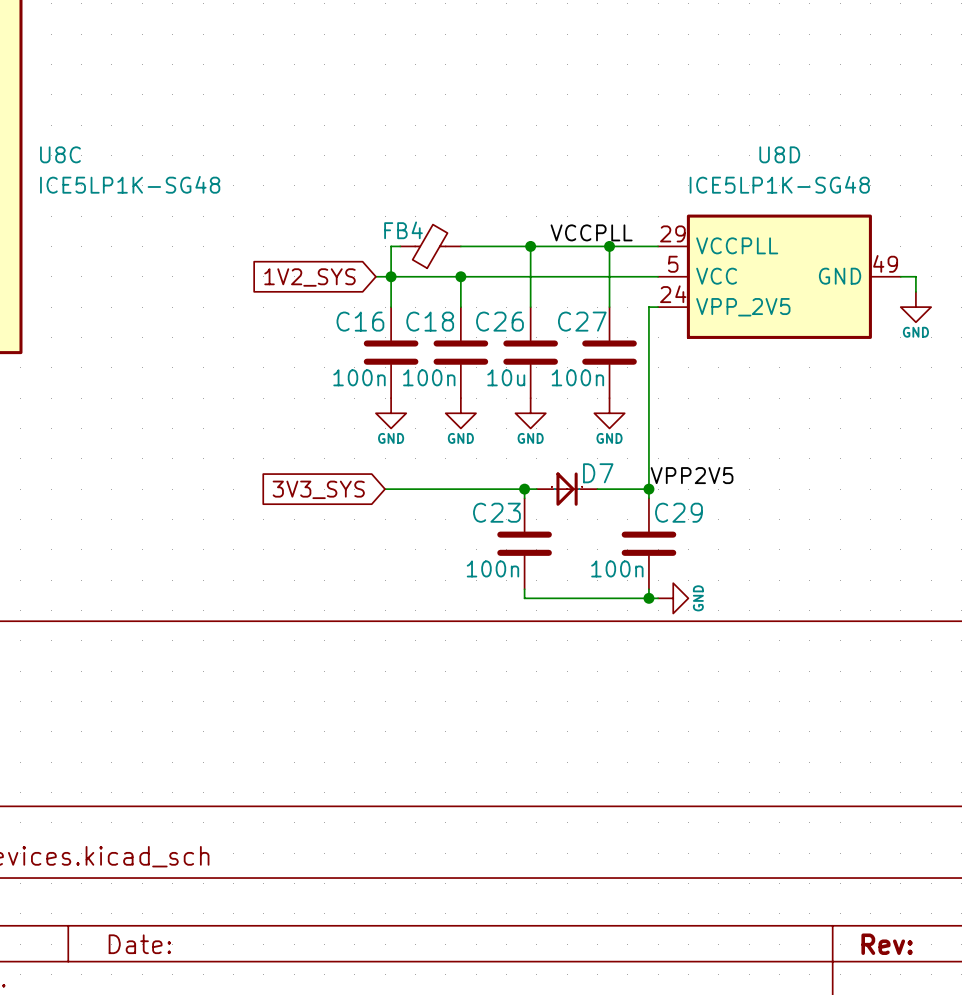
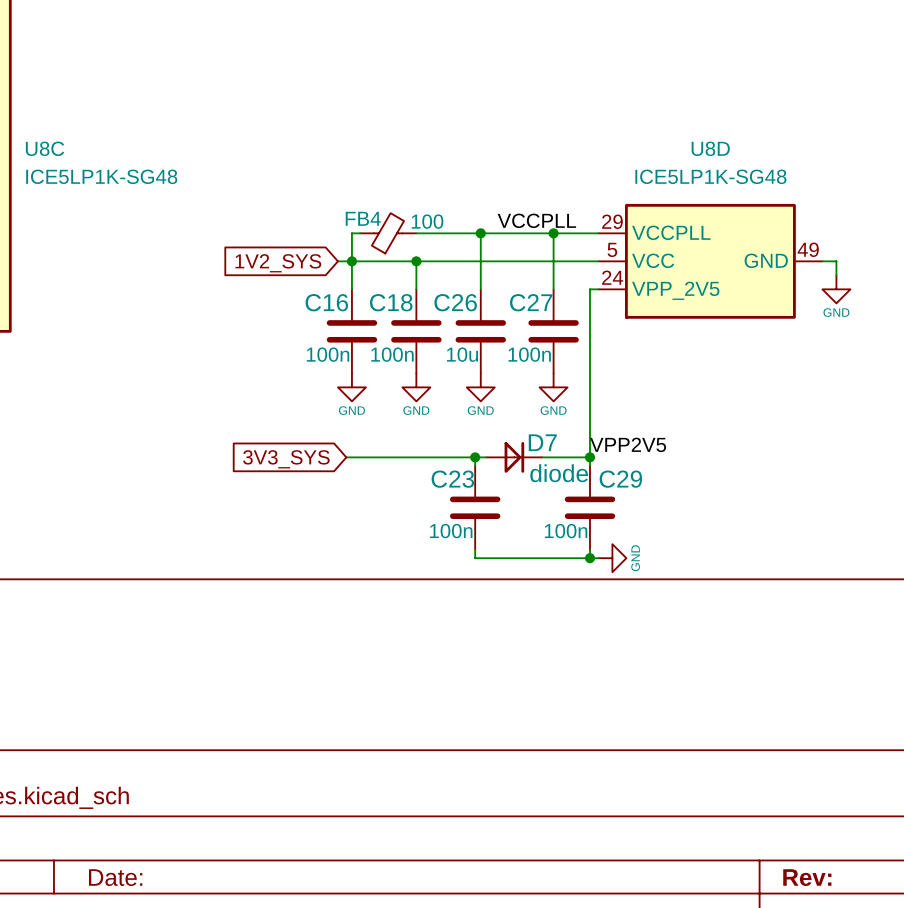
FB4 value: none -> 100 (427, 221)
D7 value: none -> diode (559, 473)

